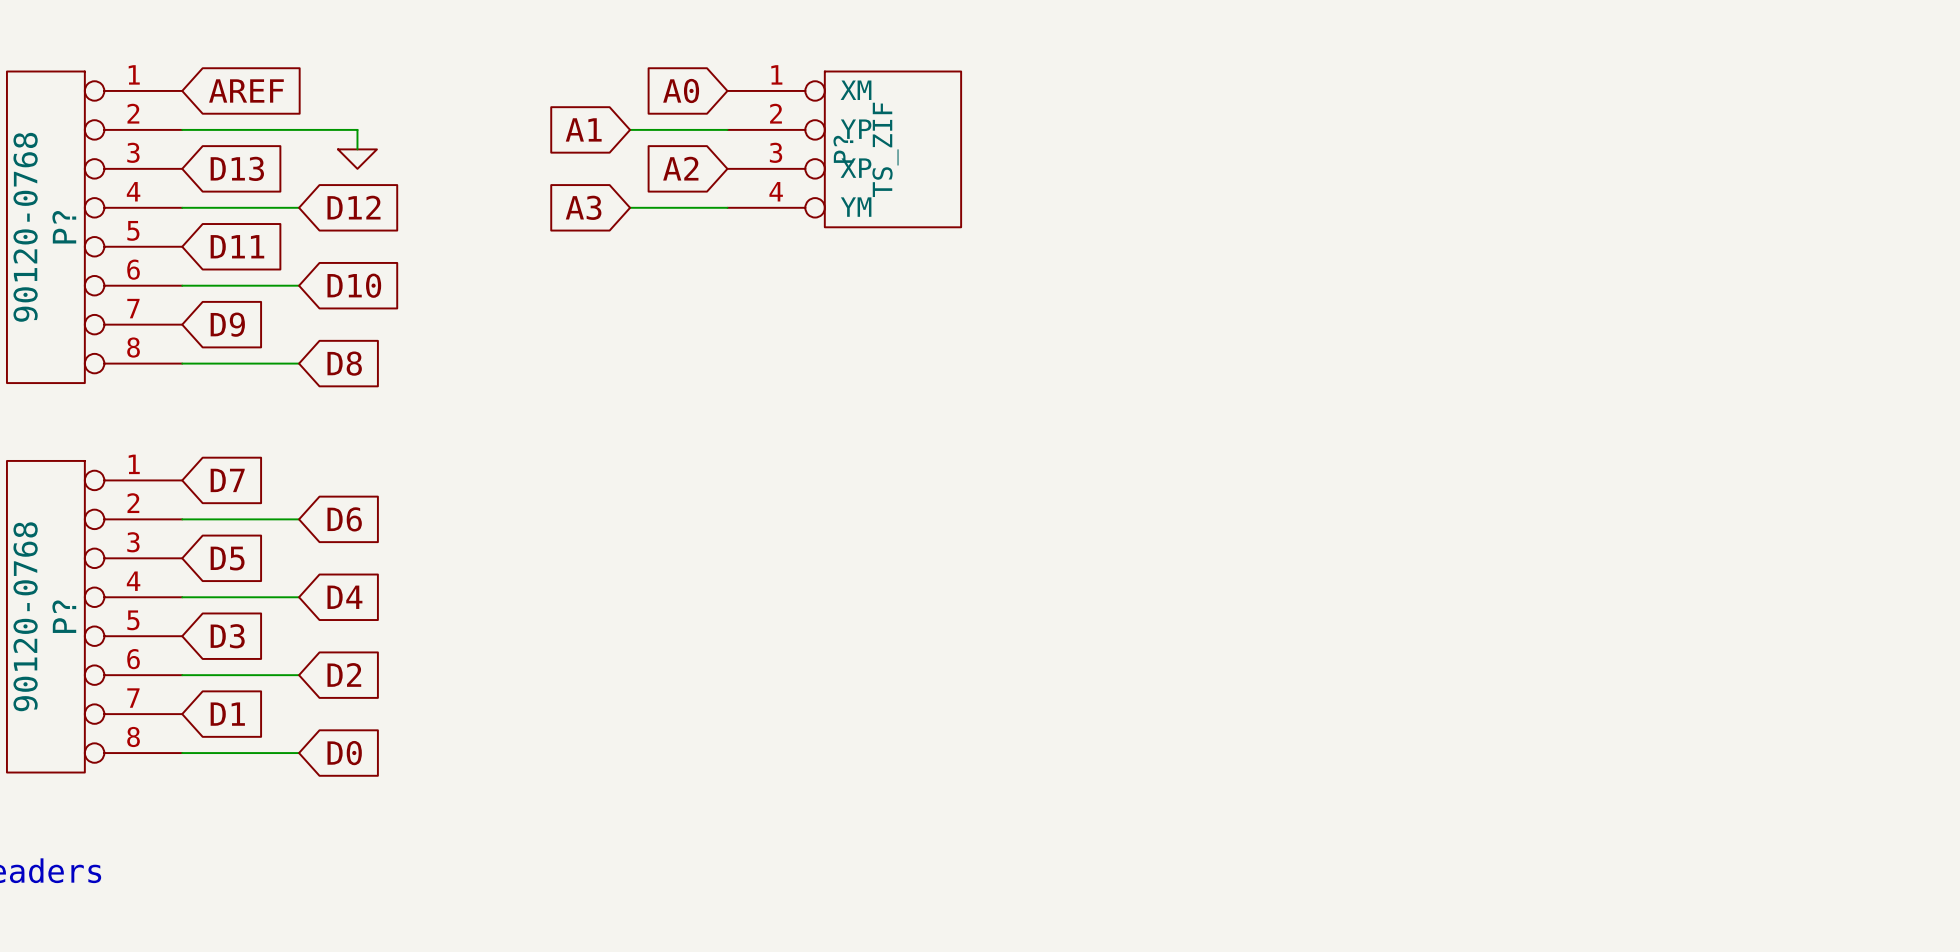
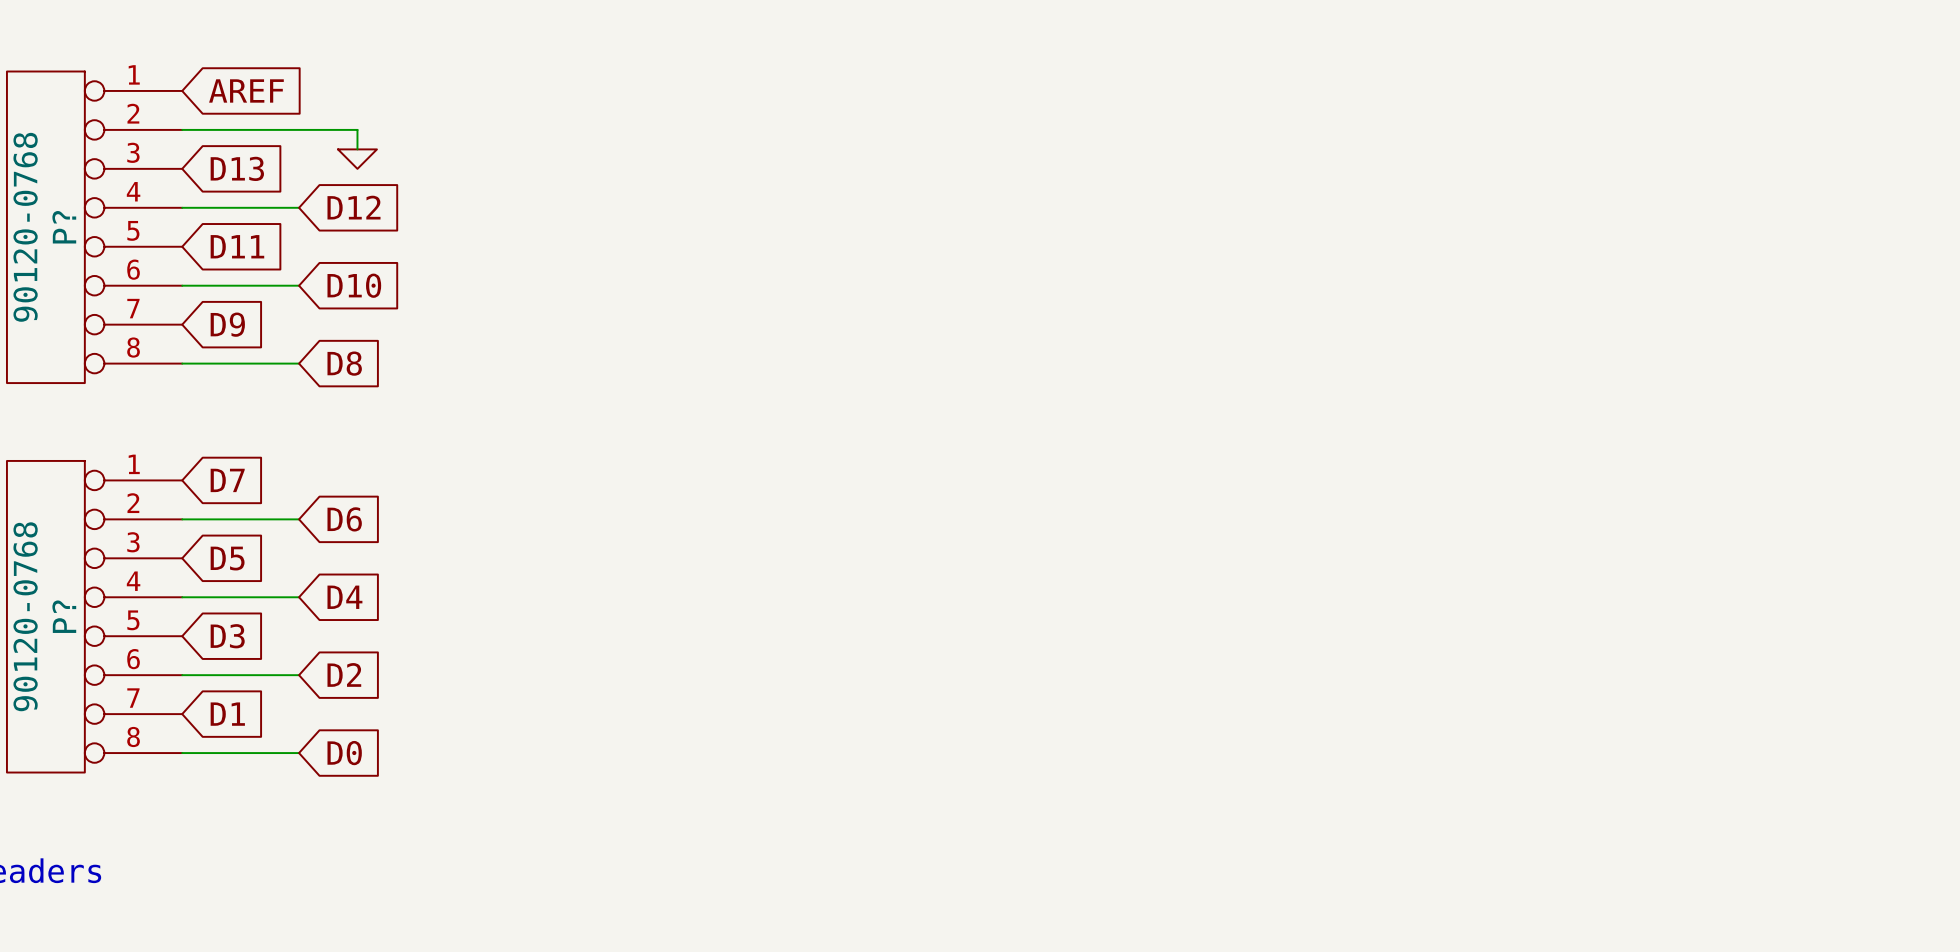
global label: A0 (681, 90) -> none
global label: A1 (583, 129) -> none
wire: (630, 129) (727, 129) -> none
P?: TS_ZIF (844, 149) -> none
global label: A2 (680, 168) -> none
global label: A3 (583, 207) -> none
wire: (630, 207) (727, 207) -> none

